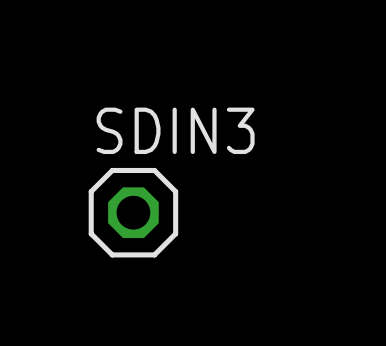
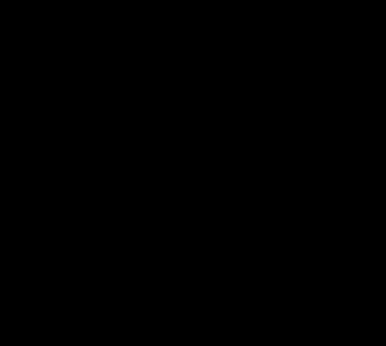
SDIN3: (133, 212) -> none

